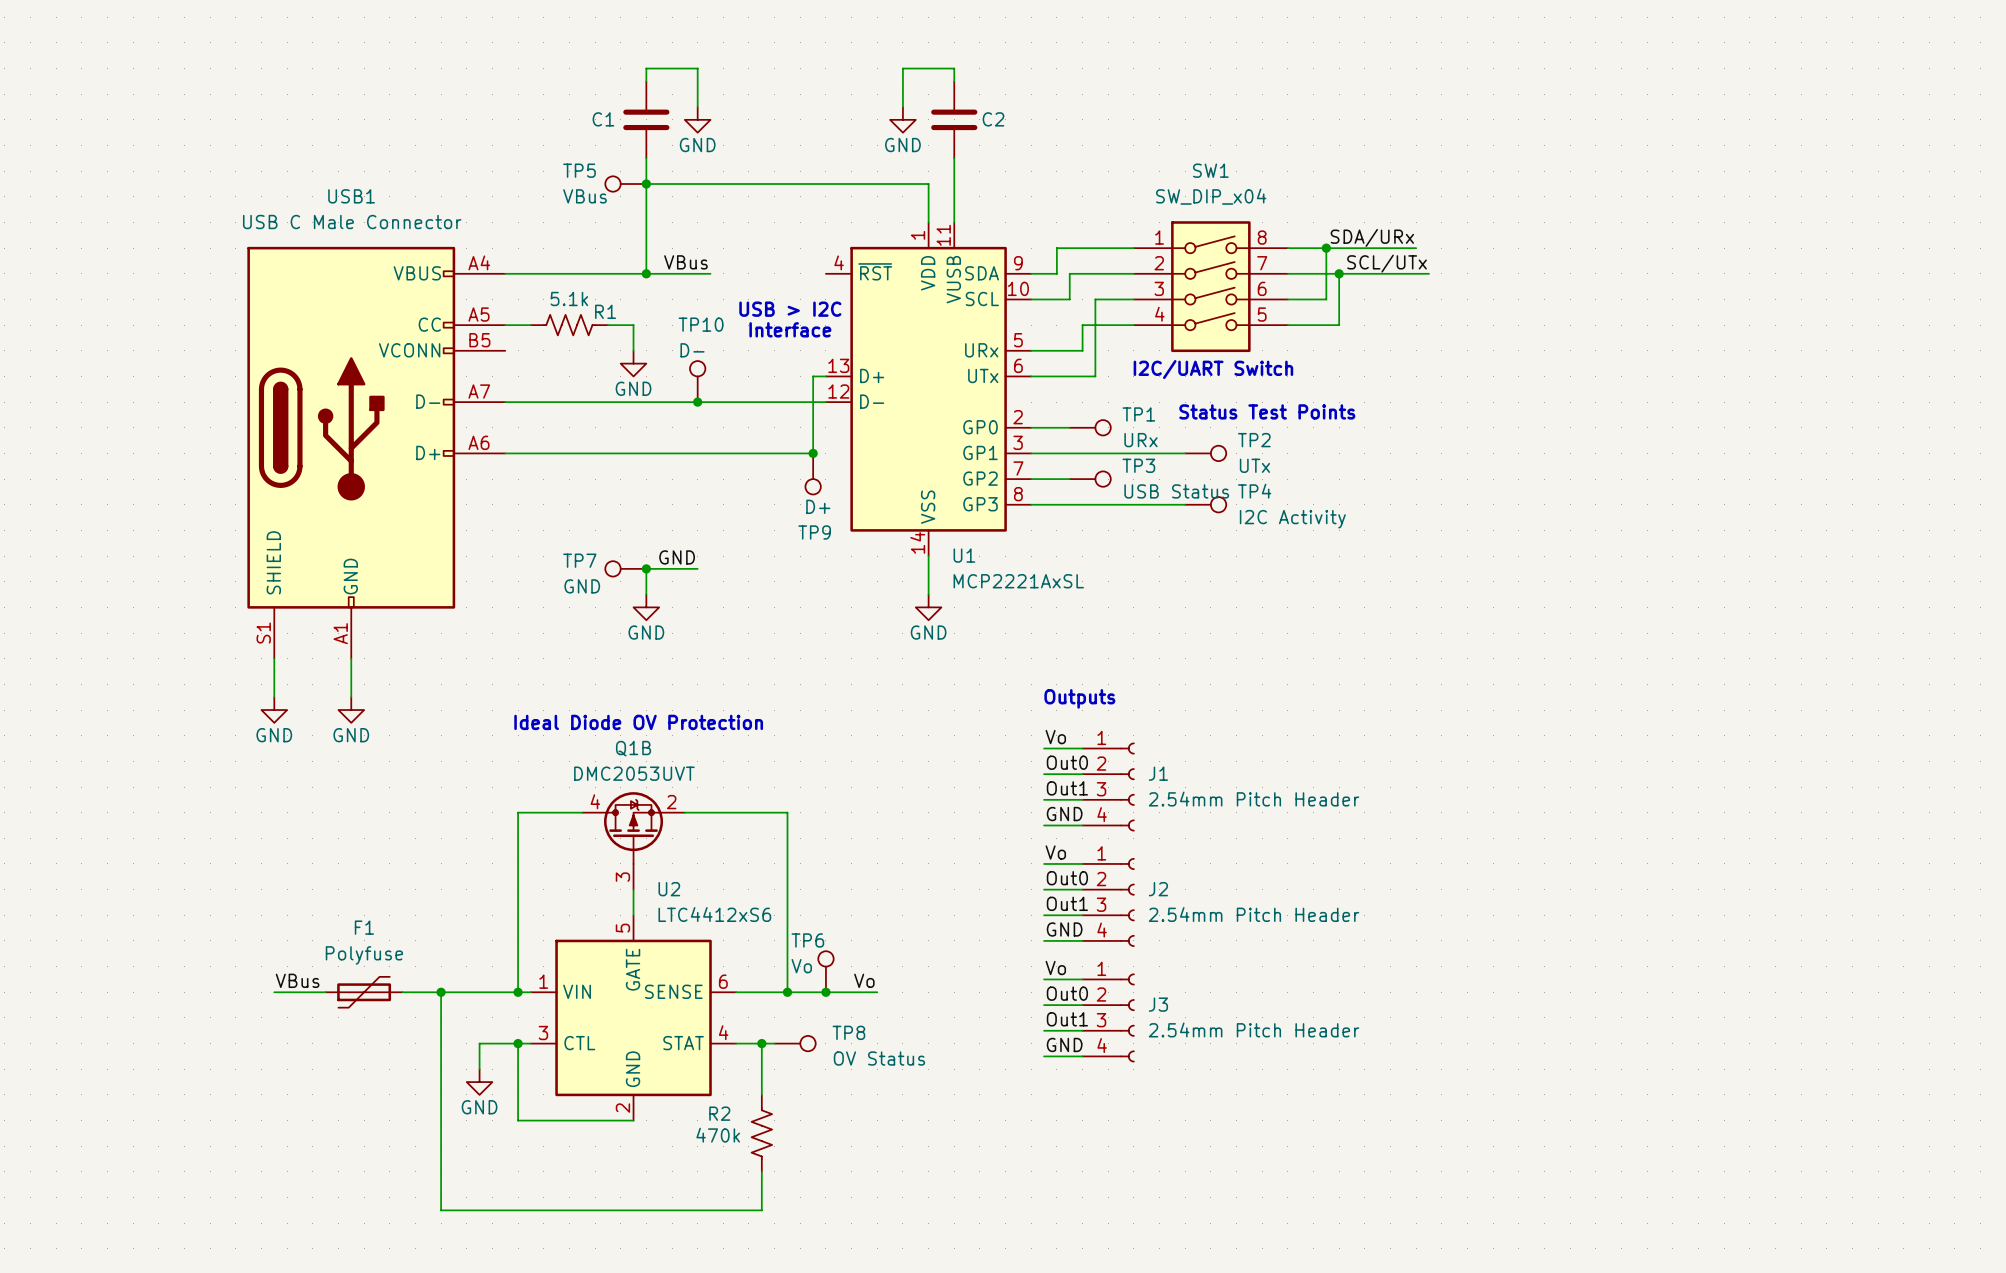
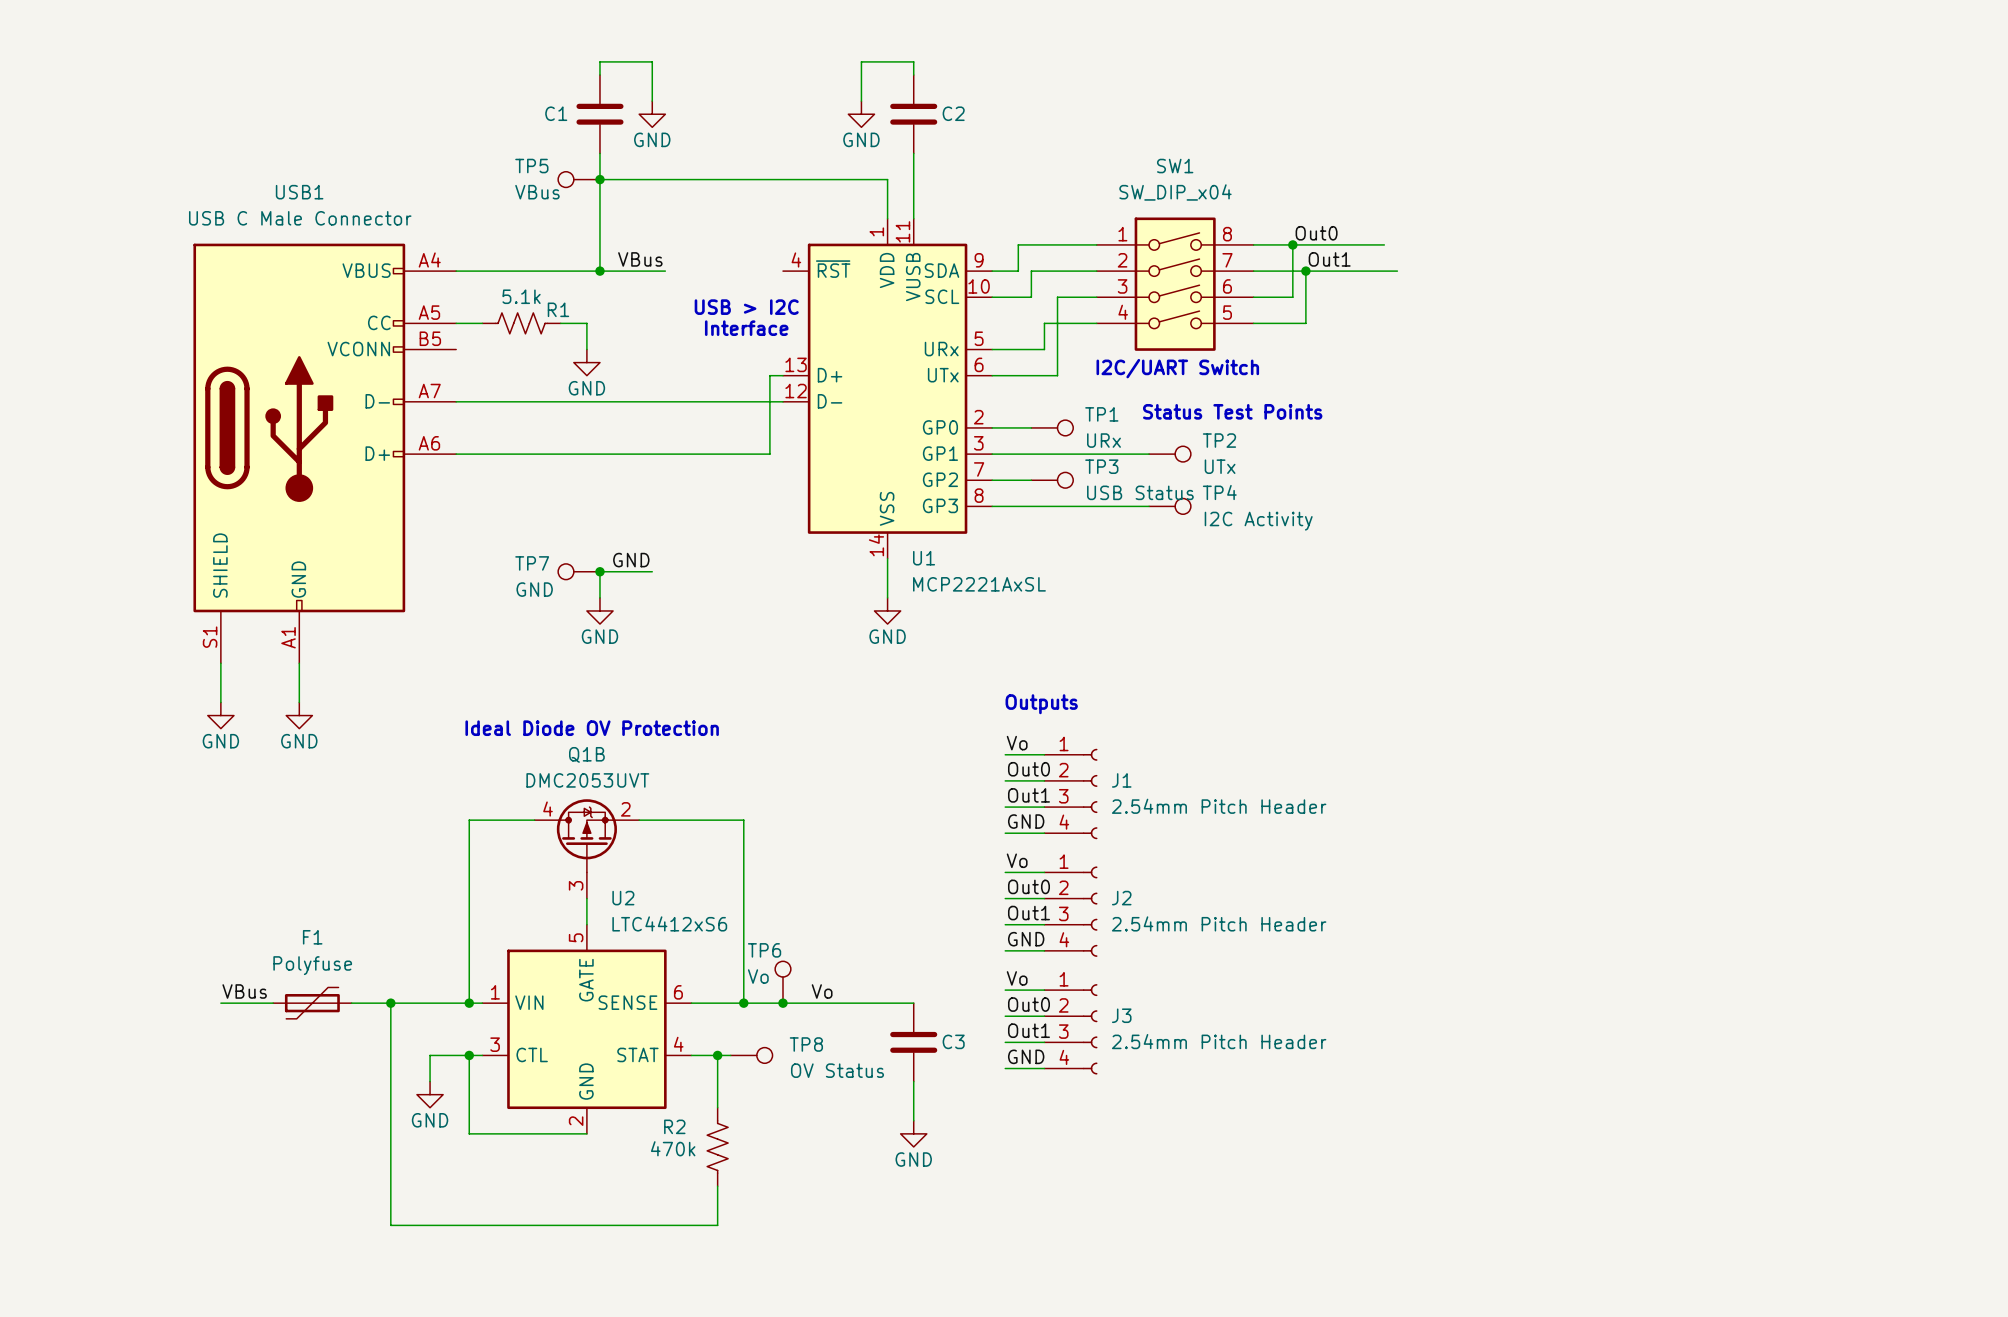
label: none -> Out0 (1316, 233)
label: SDA/URx (1372, 237) -> none
label: none -> Out1 (1329, 259)
label: SCL/UTx (1387, 263) -> none
TP10: D- (697, 381) -> none
junction: (697, 402) -> none
junction: (813, 453) -> none
TP9: D+ (813, 473) -> none
wire: none -> (835, 1003) (913, 1003)
C3: none -> (913, 1042)
wire: none -> (913, 1081) (913, 1120)
power symbol: none -> GND (913, 1133)

